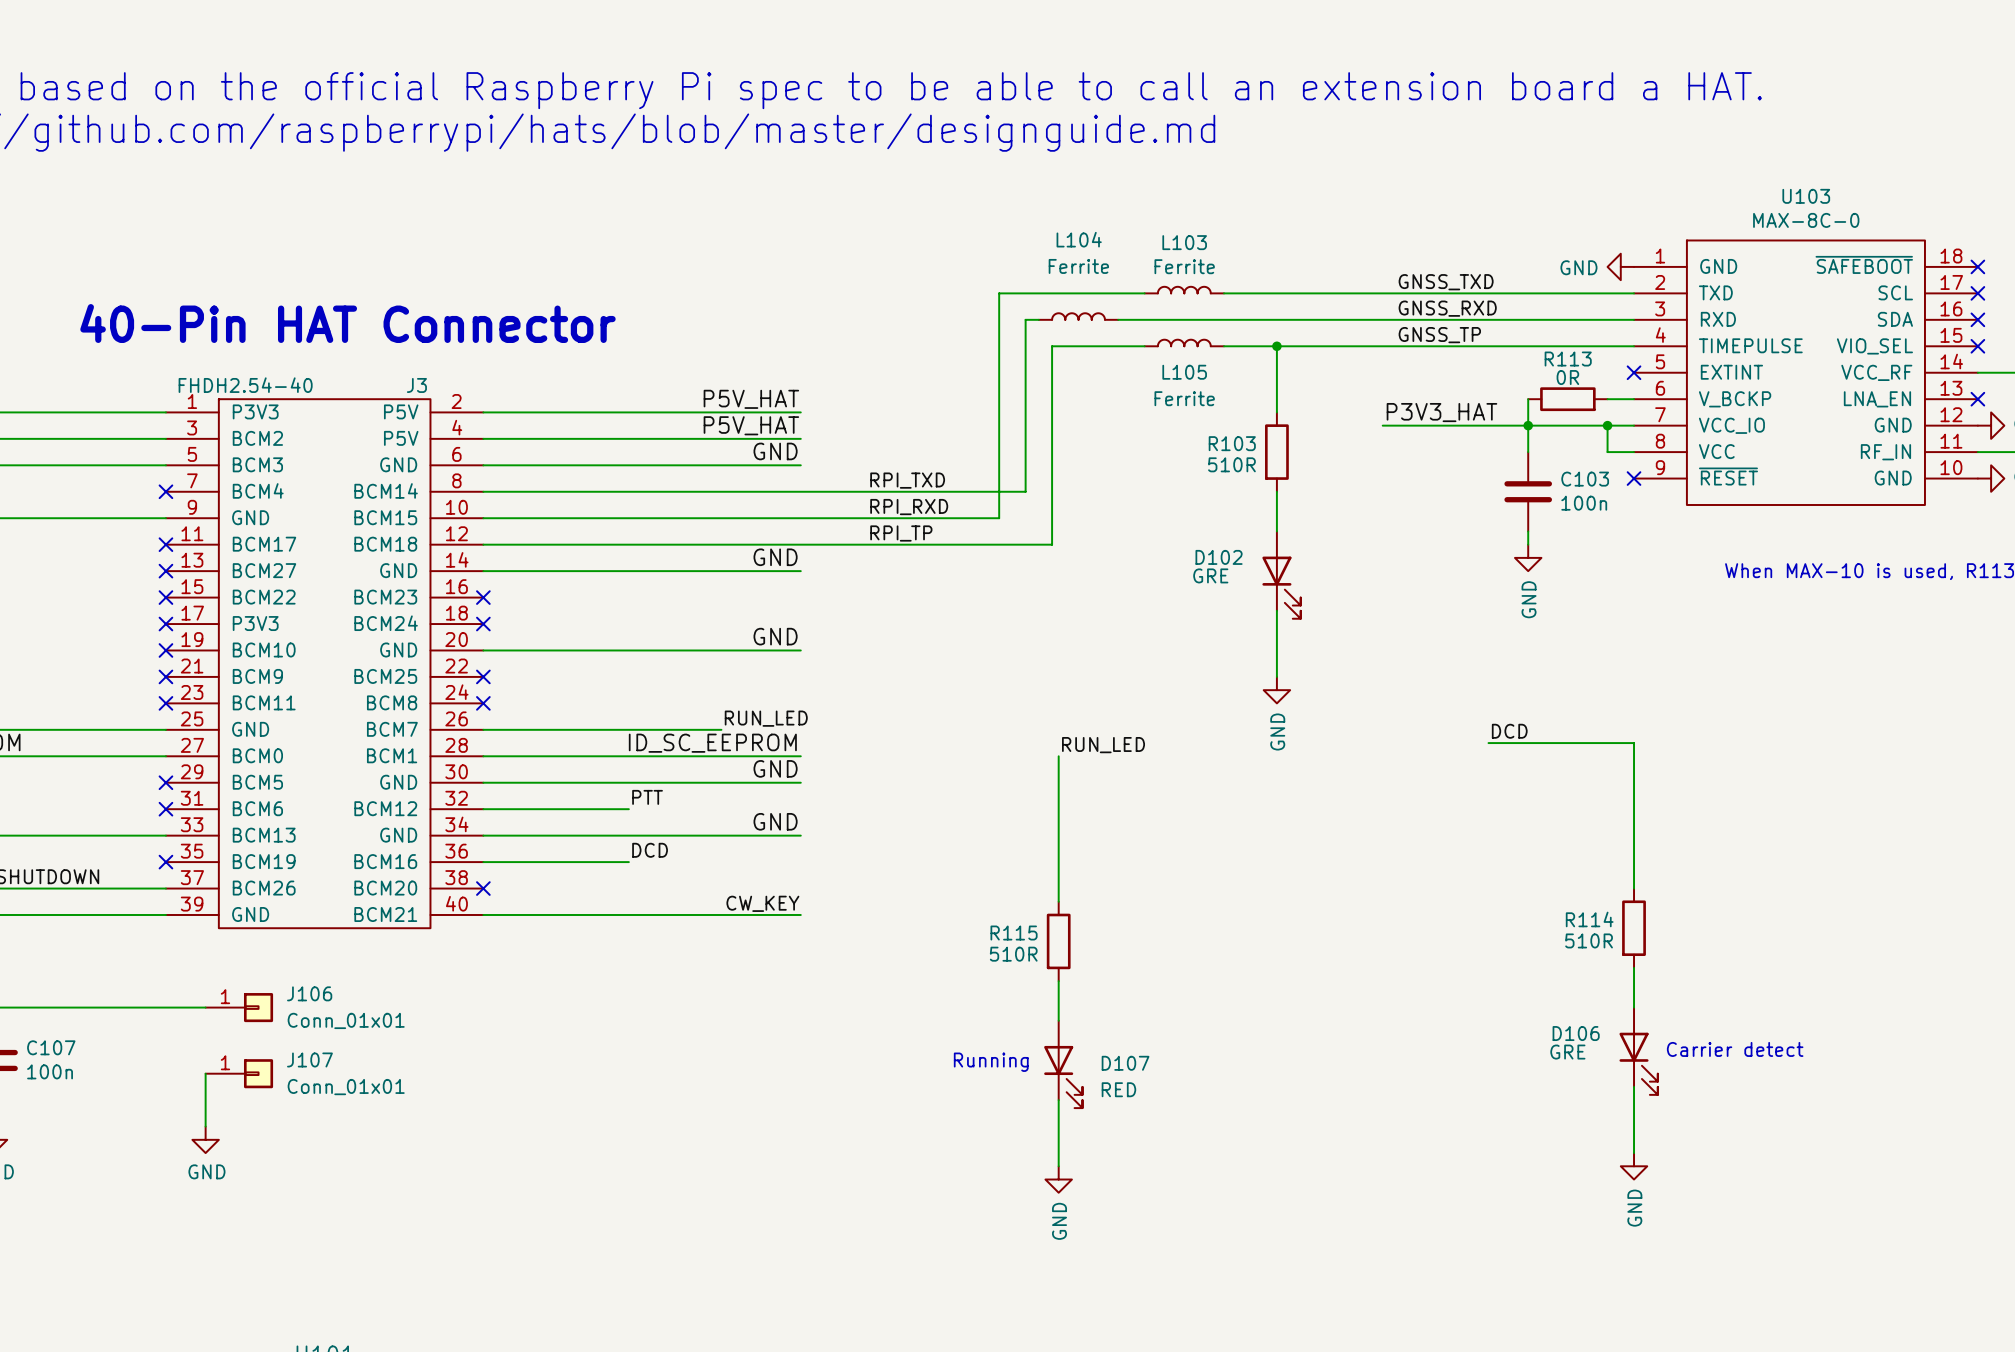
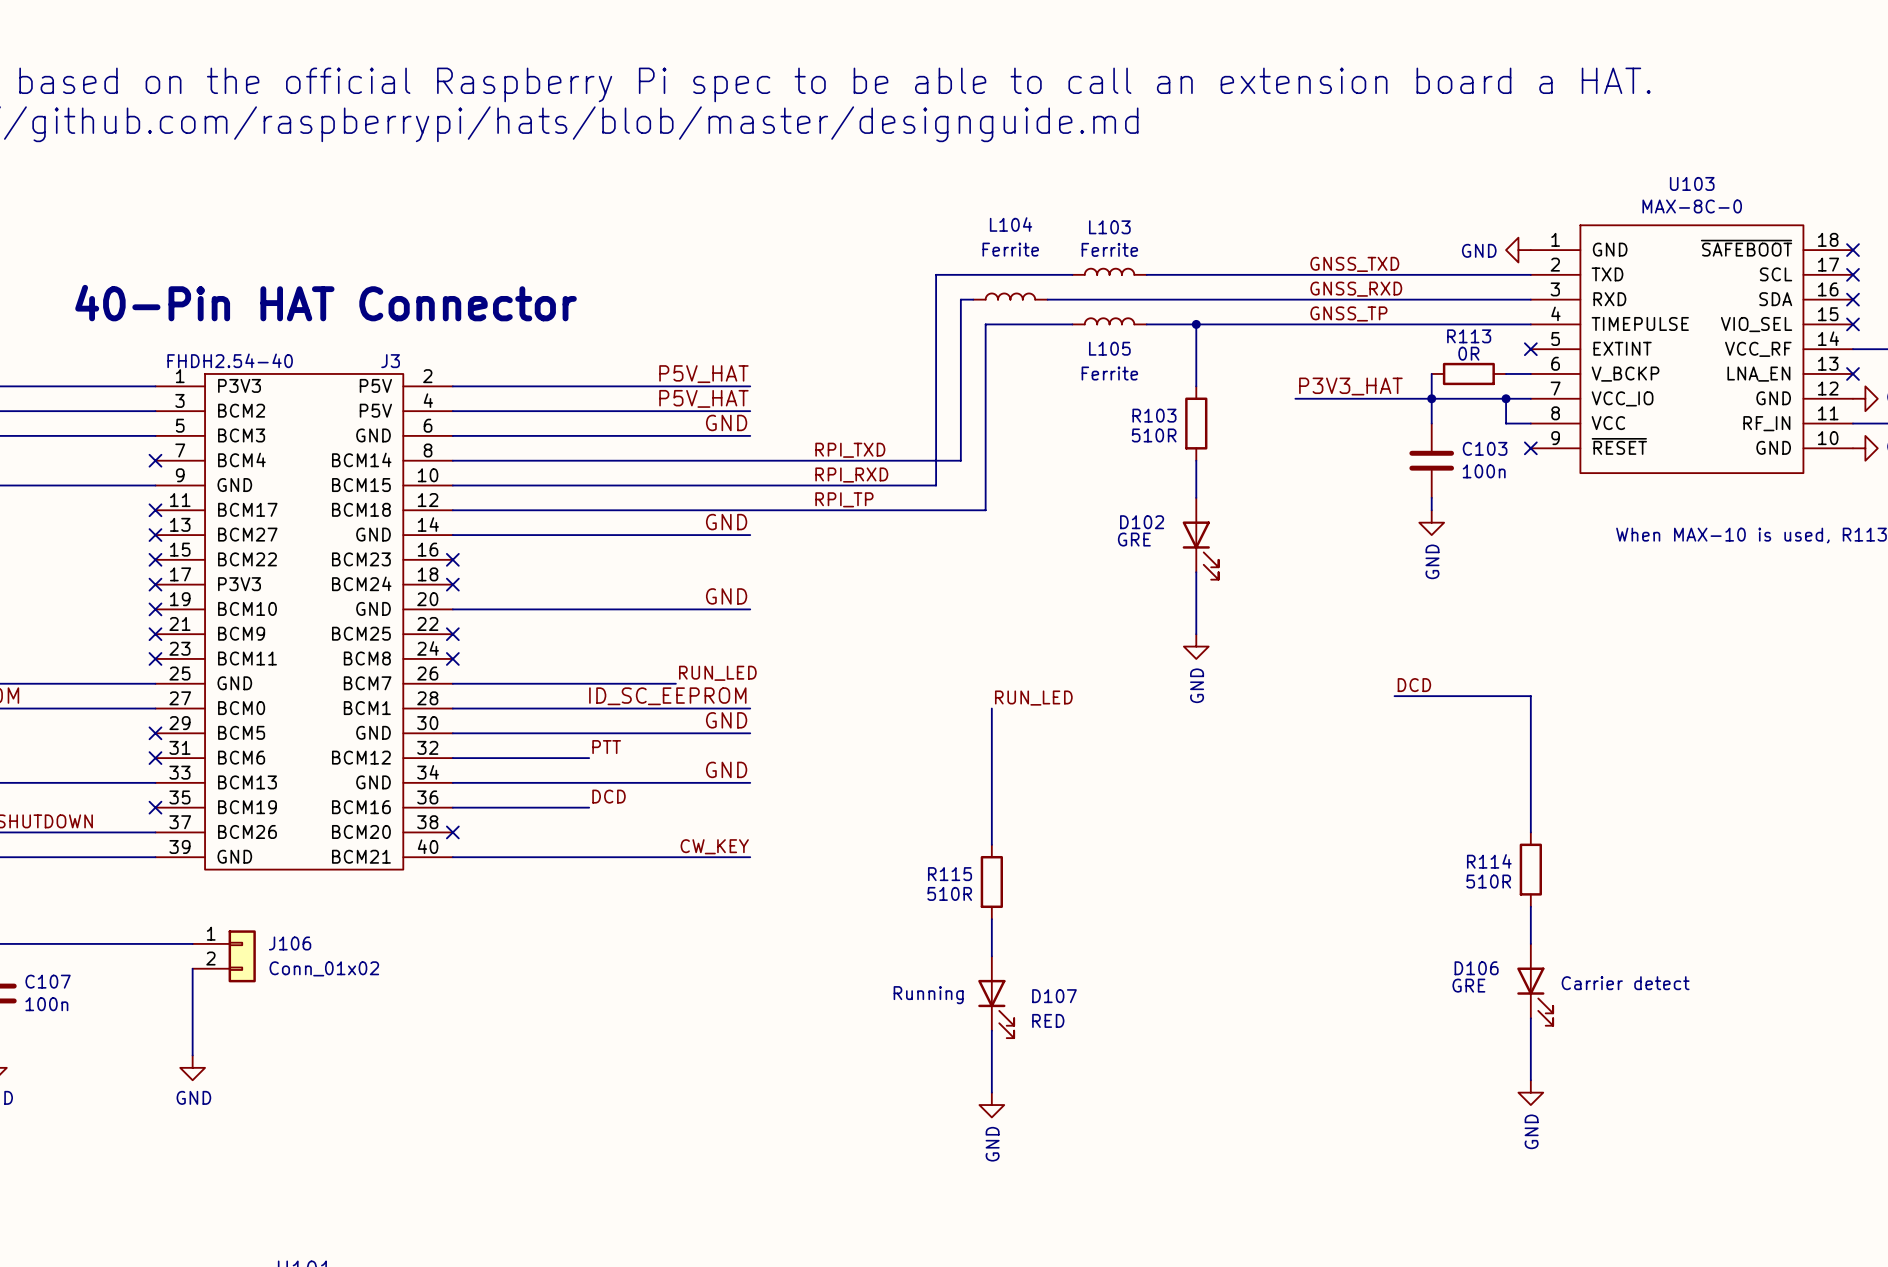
J106 symbol: [205, 993, 274, 1023] -> [192, 930, 256, 983]
J106 value: Conn_01x01 (346, 1020) -> Conn_01x02 (324, 968)
wire: none -> (192, 968) (192, 1005)
J107: Conn_01x01 (239, 1073) -> none

